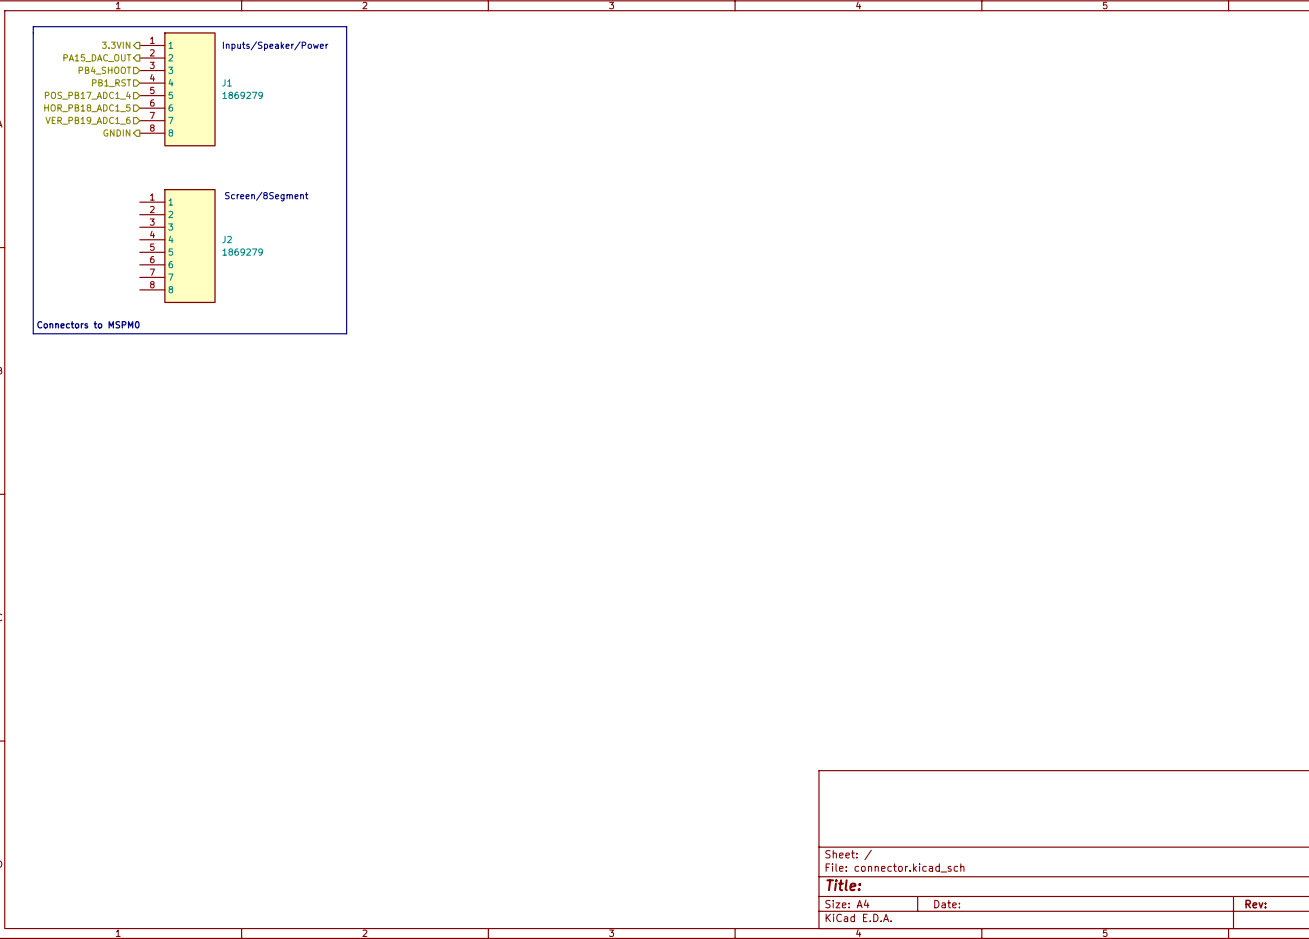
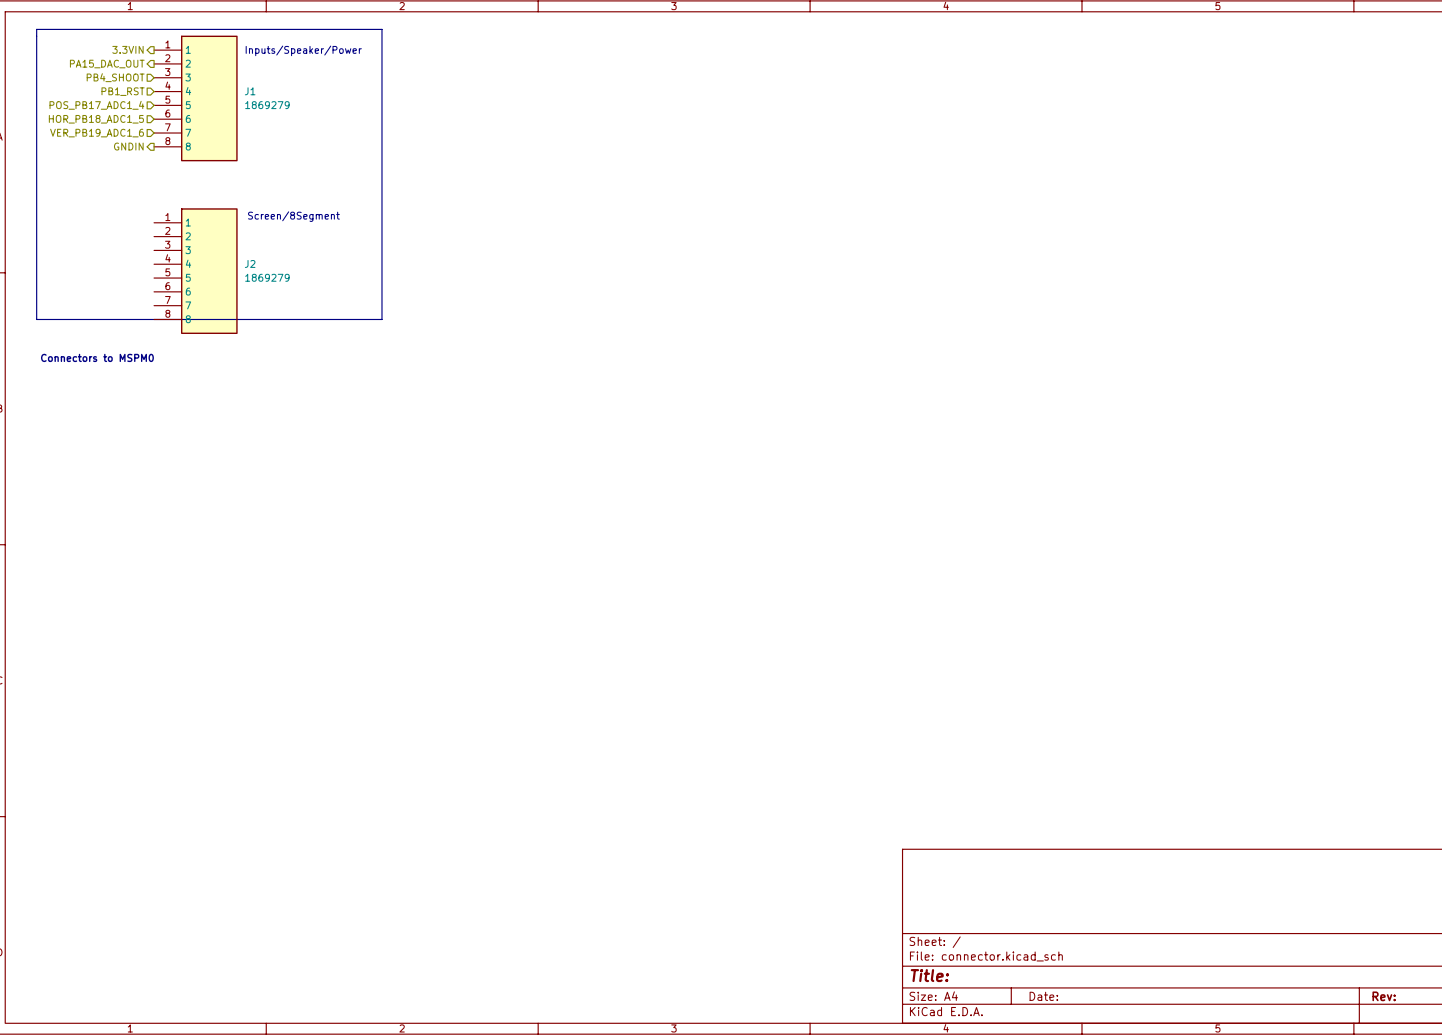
line: (33, 289) (33, 333) (346, 333) (346, 289) -> (36, 319) (381, 319)

